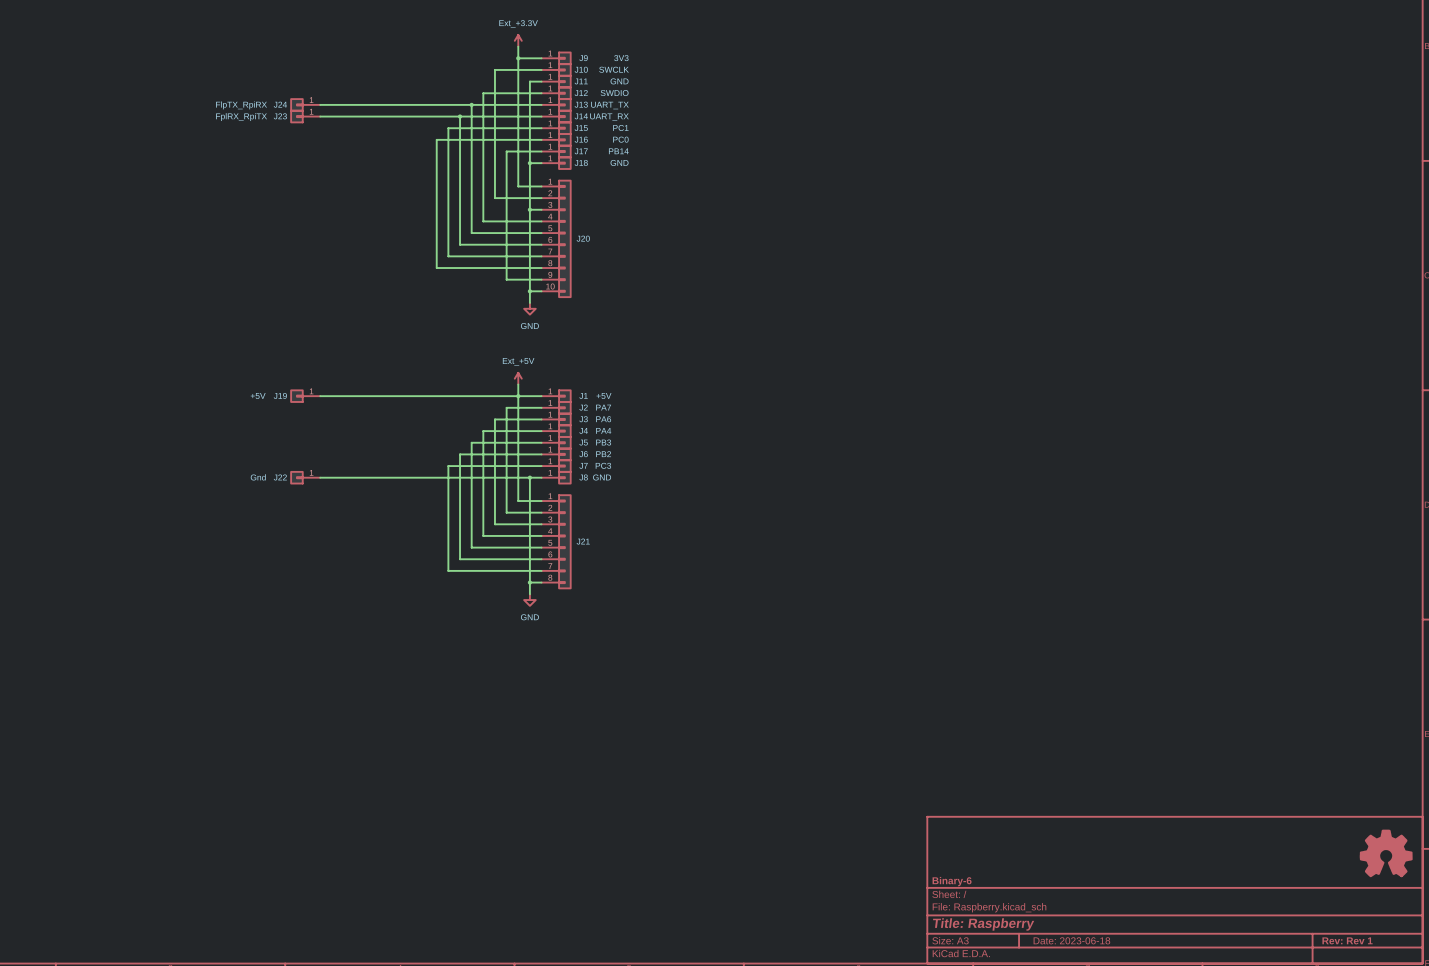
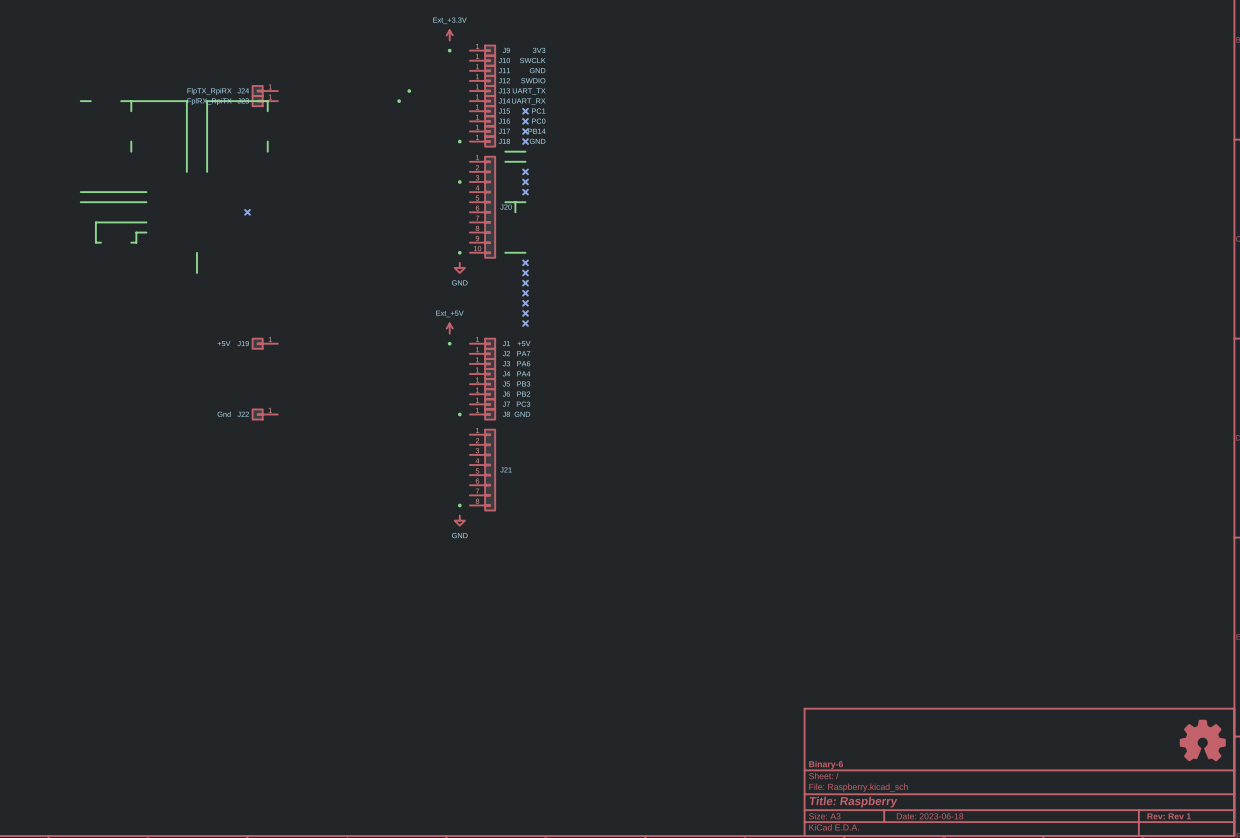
wire: (518, 46) (518, 186) (541, 186) -> none
wire: (518, 58) (541, 58) -> none
wire: (541, 69) (494, 69) (494, 198) (541, 198) -> none
wire: (541, 81) (529, 81) (529, 302) -> none
wire: (541, 93) (483, 93) (483, 221) (541, 221) -> none
wire: (320, 104) (541, 104) -> none
wire: (471, 104) (471, 233) (541, 233) -> none
wire: none -> (80, 101) (90, 101)
wire: none -> (121, 101) (186, 101) (186, 171)
wire: none -> (131, 101) (131, 111)
wire: (320, 116) (541, 116) -> none
wire: (460, 116) (460, 244) (541, 244) -> none
wire: none -> (267, 111) (267, 101) (207, 101) (207, 171)
wire: (541, 128) (448, 128) (448, 256) (541, 256) -> none
no-connect mark: none -> (525, 111)
wire: (541, 139) (436, 139) (436, 268) (541, 268) -> none
no-connect mark: none -> (525, 121)
wire: (541, 151) (506, 151) (506, 279) (541, 279) -> none
no-connect mark: none -> (525, 131)
wire: none -> (131, 141) (131, 151)
wire: none -> (267, 141) (267, 151)
wire: (529, 163) (541, 163) -> none
no-connect mark: none -> (525, 141)
wire: none -> (505, 151) (525, 151)
wire: none -> (505, 161) (525, 161)
no-connect mark: none -> (525, 171)
wire: (529, 209) (541, 209) -> none
no-connect mark: none -> (525, 182)
wire: none -> (80, 192) (146, 192)
no-connect mark: none -> (525, 192)
wire: none -> (80, 202) (146, 202)
wire: none -> (505, 202) (525, 202)
wire: none -> (515, 202) (515, 212)
no-connect mark: none -> (247, 212)
wire: none -> (146, 222) (95, 222) (95, 242) (100, 242)
wire: none -> (146, 232) (136, 232) (136, 242) (131, 242)
wire: none -> (196, 252) (196, 272)
wire: (529, 291) (541, 291) -> none
wire: none -> (505, 252) (525, 252)
no-connect mark: none -> (525, 262)
no-connect mark: none -> (525, 272)
no-connect mark: none -> (525, 283)
no-connect mark: none -> (525, 293)
no-connect mark: none -> (525, 303)
no-connect mark: none -> (525, 313)
no-connect mark: none -> (525, 323)
wire: (518, 384) (518, 501) (541, 501) -> none
wire: (320, 396) (541, 396) -> none
wire: (541, 407) (506, 407) (506, 512) (541, 512) -> none
wire: (541, 419) (494, 419) (494, 524) (541, 524) -> none
wire: (541, 431) (483, 431) (483, 535) (541, 535) -> none
wire: (541, 442) (471, 442) (471, 547) (541, 547) -> none
wire: (541, 454) (460, 454) (460, 559) (541, 559) -> none
wire: (541, 466) (448, 466) (448, 570) (541, 570) -> none
wire: (320, 477) (541, 477) -> none
wire: (529, 477) (529, 594) -> none
wire: (529, 582) (541, 582) -> none

